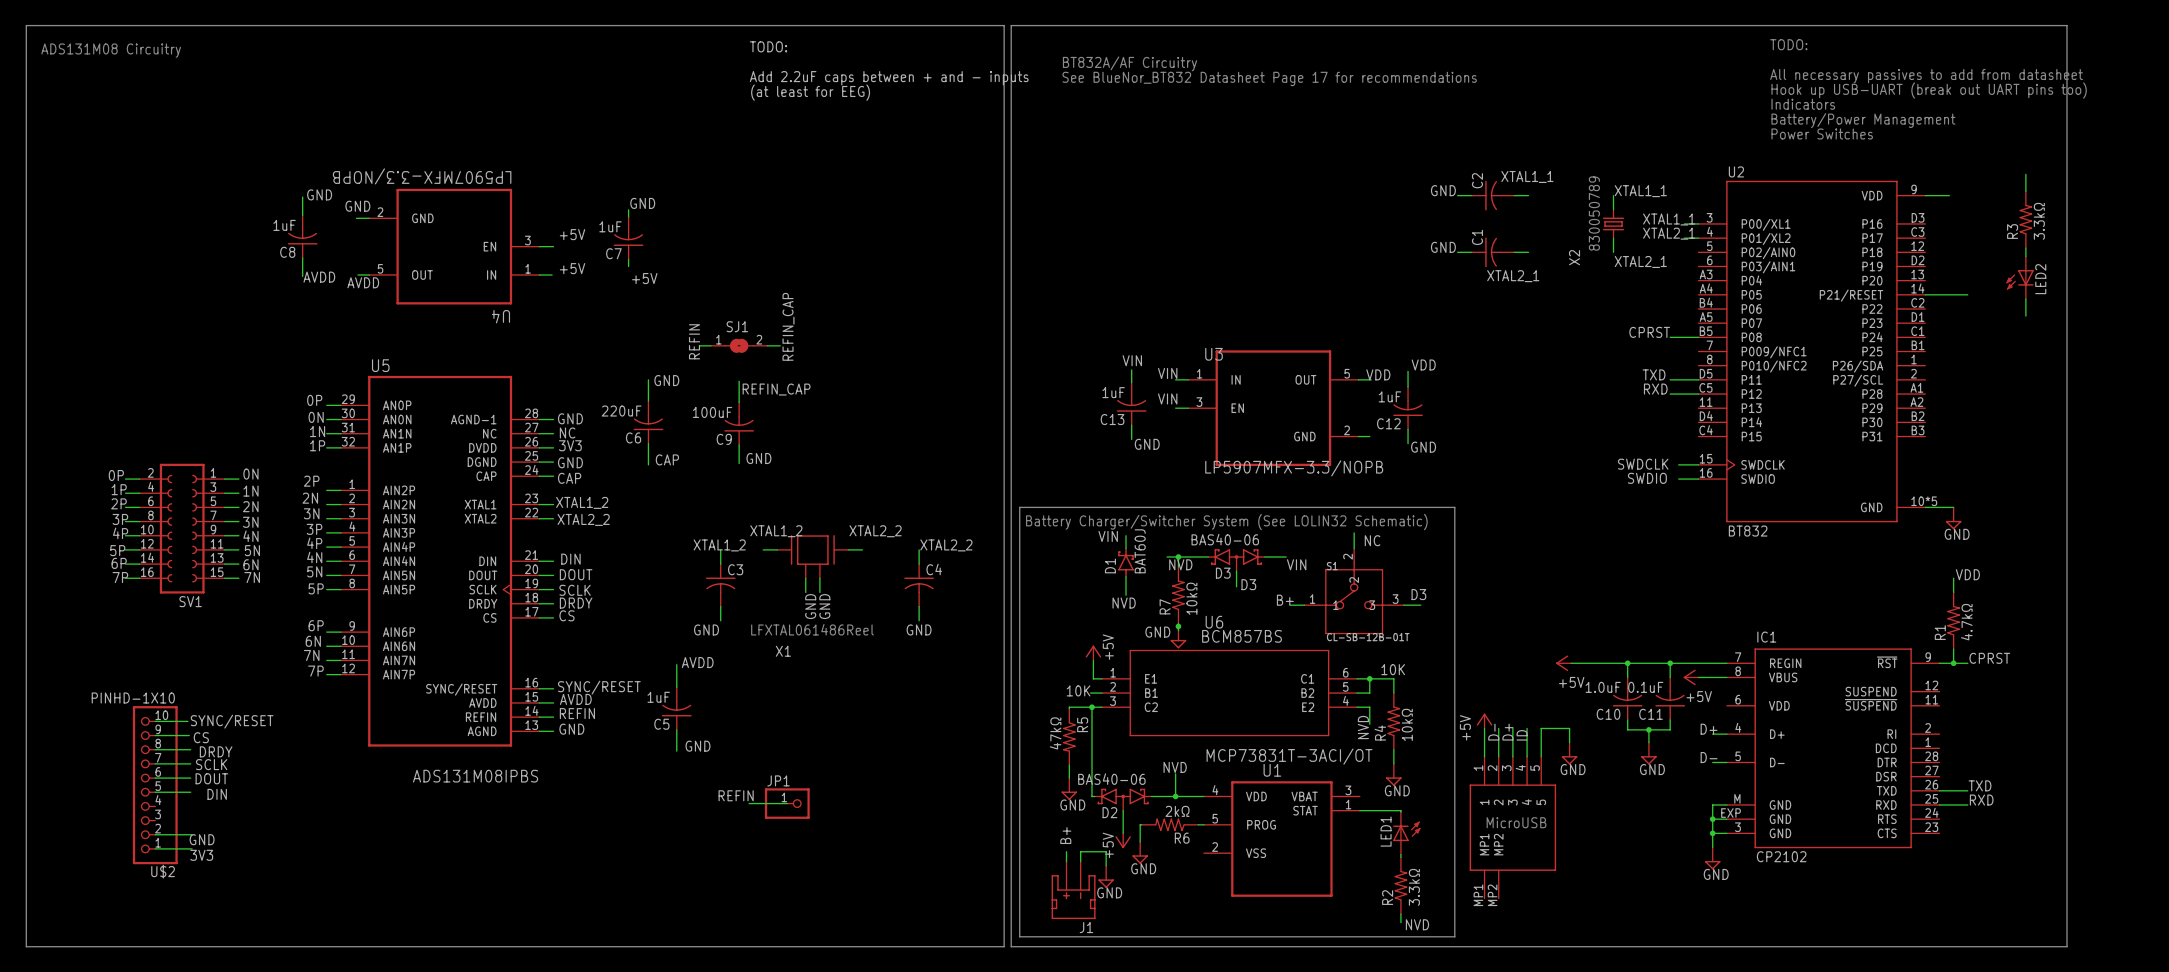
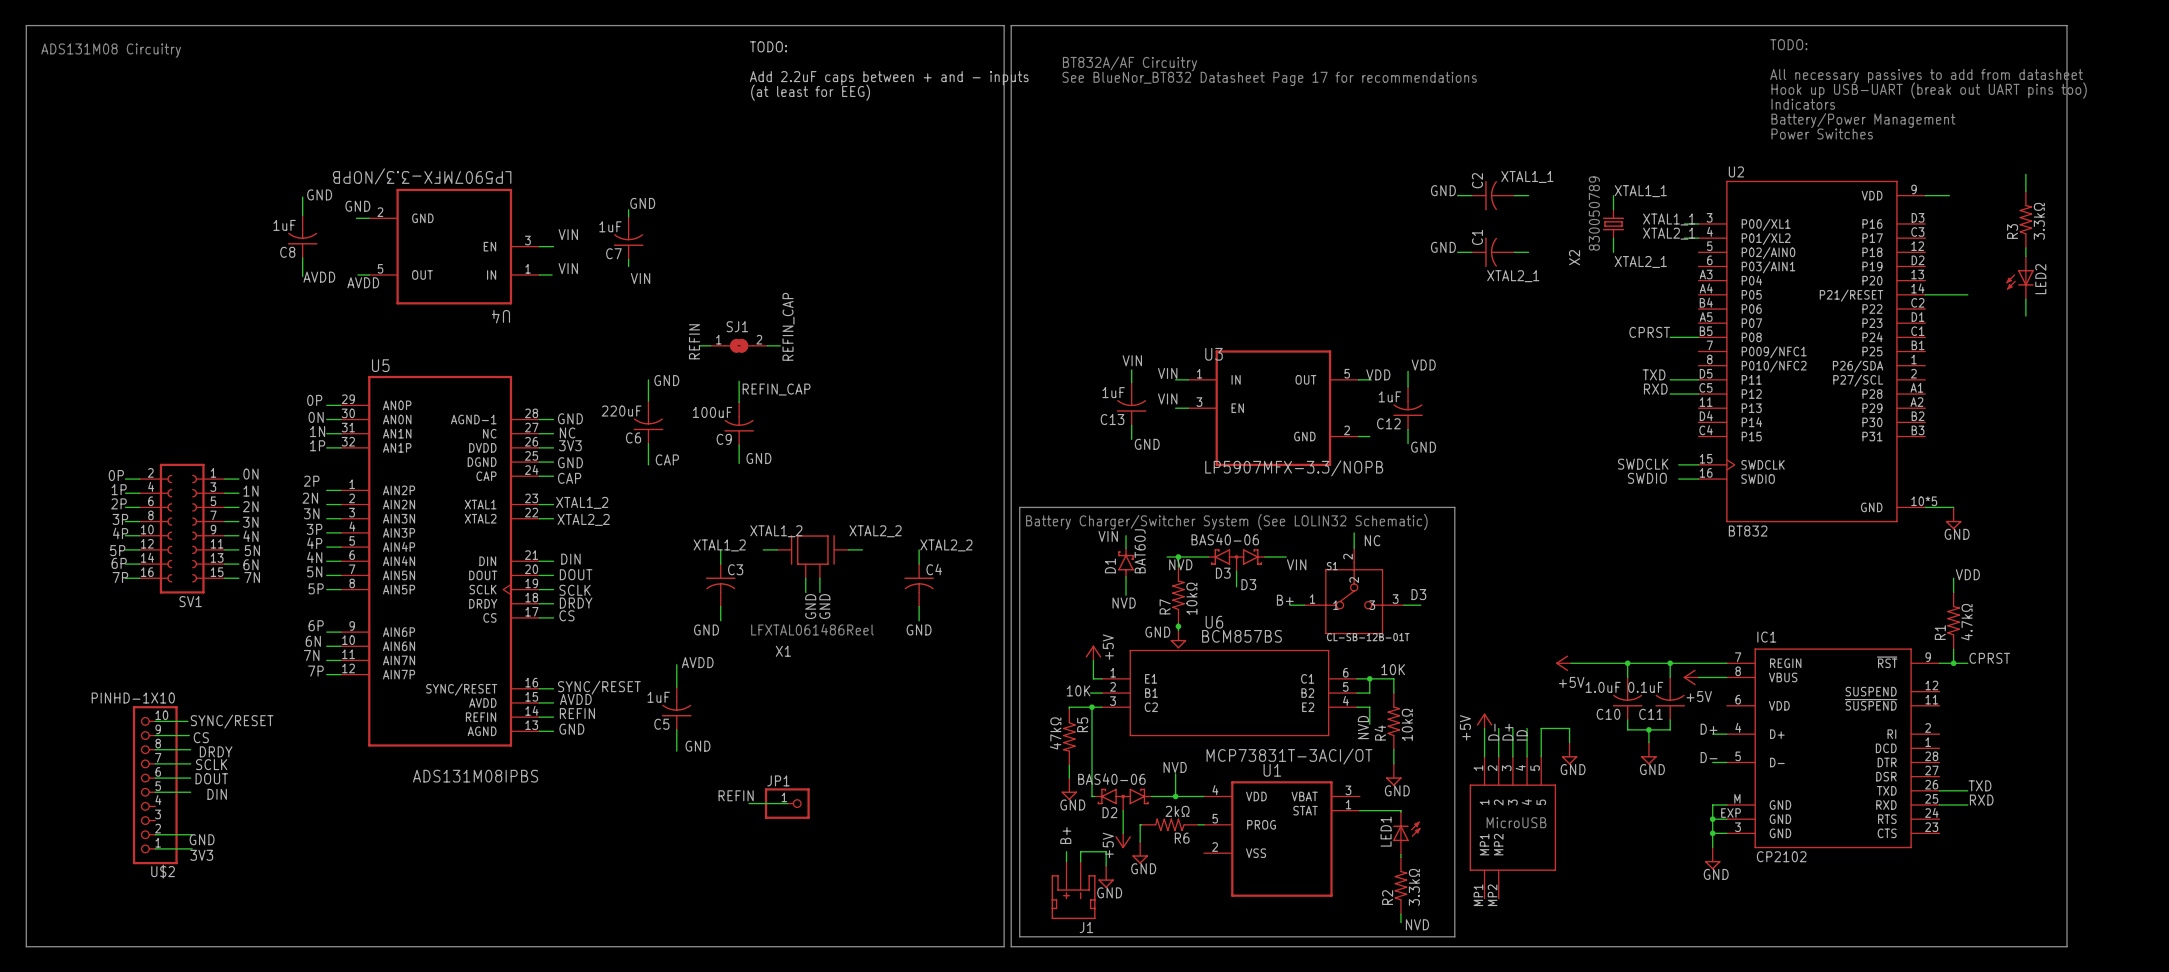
label: +5V (572, 234) -> VIN (568, 234)
label: +5V (572, 268) -> VIN (568, 268)
label: +5V (644, 278) -> VIN (640, 278)

